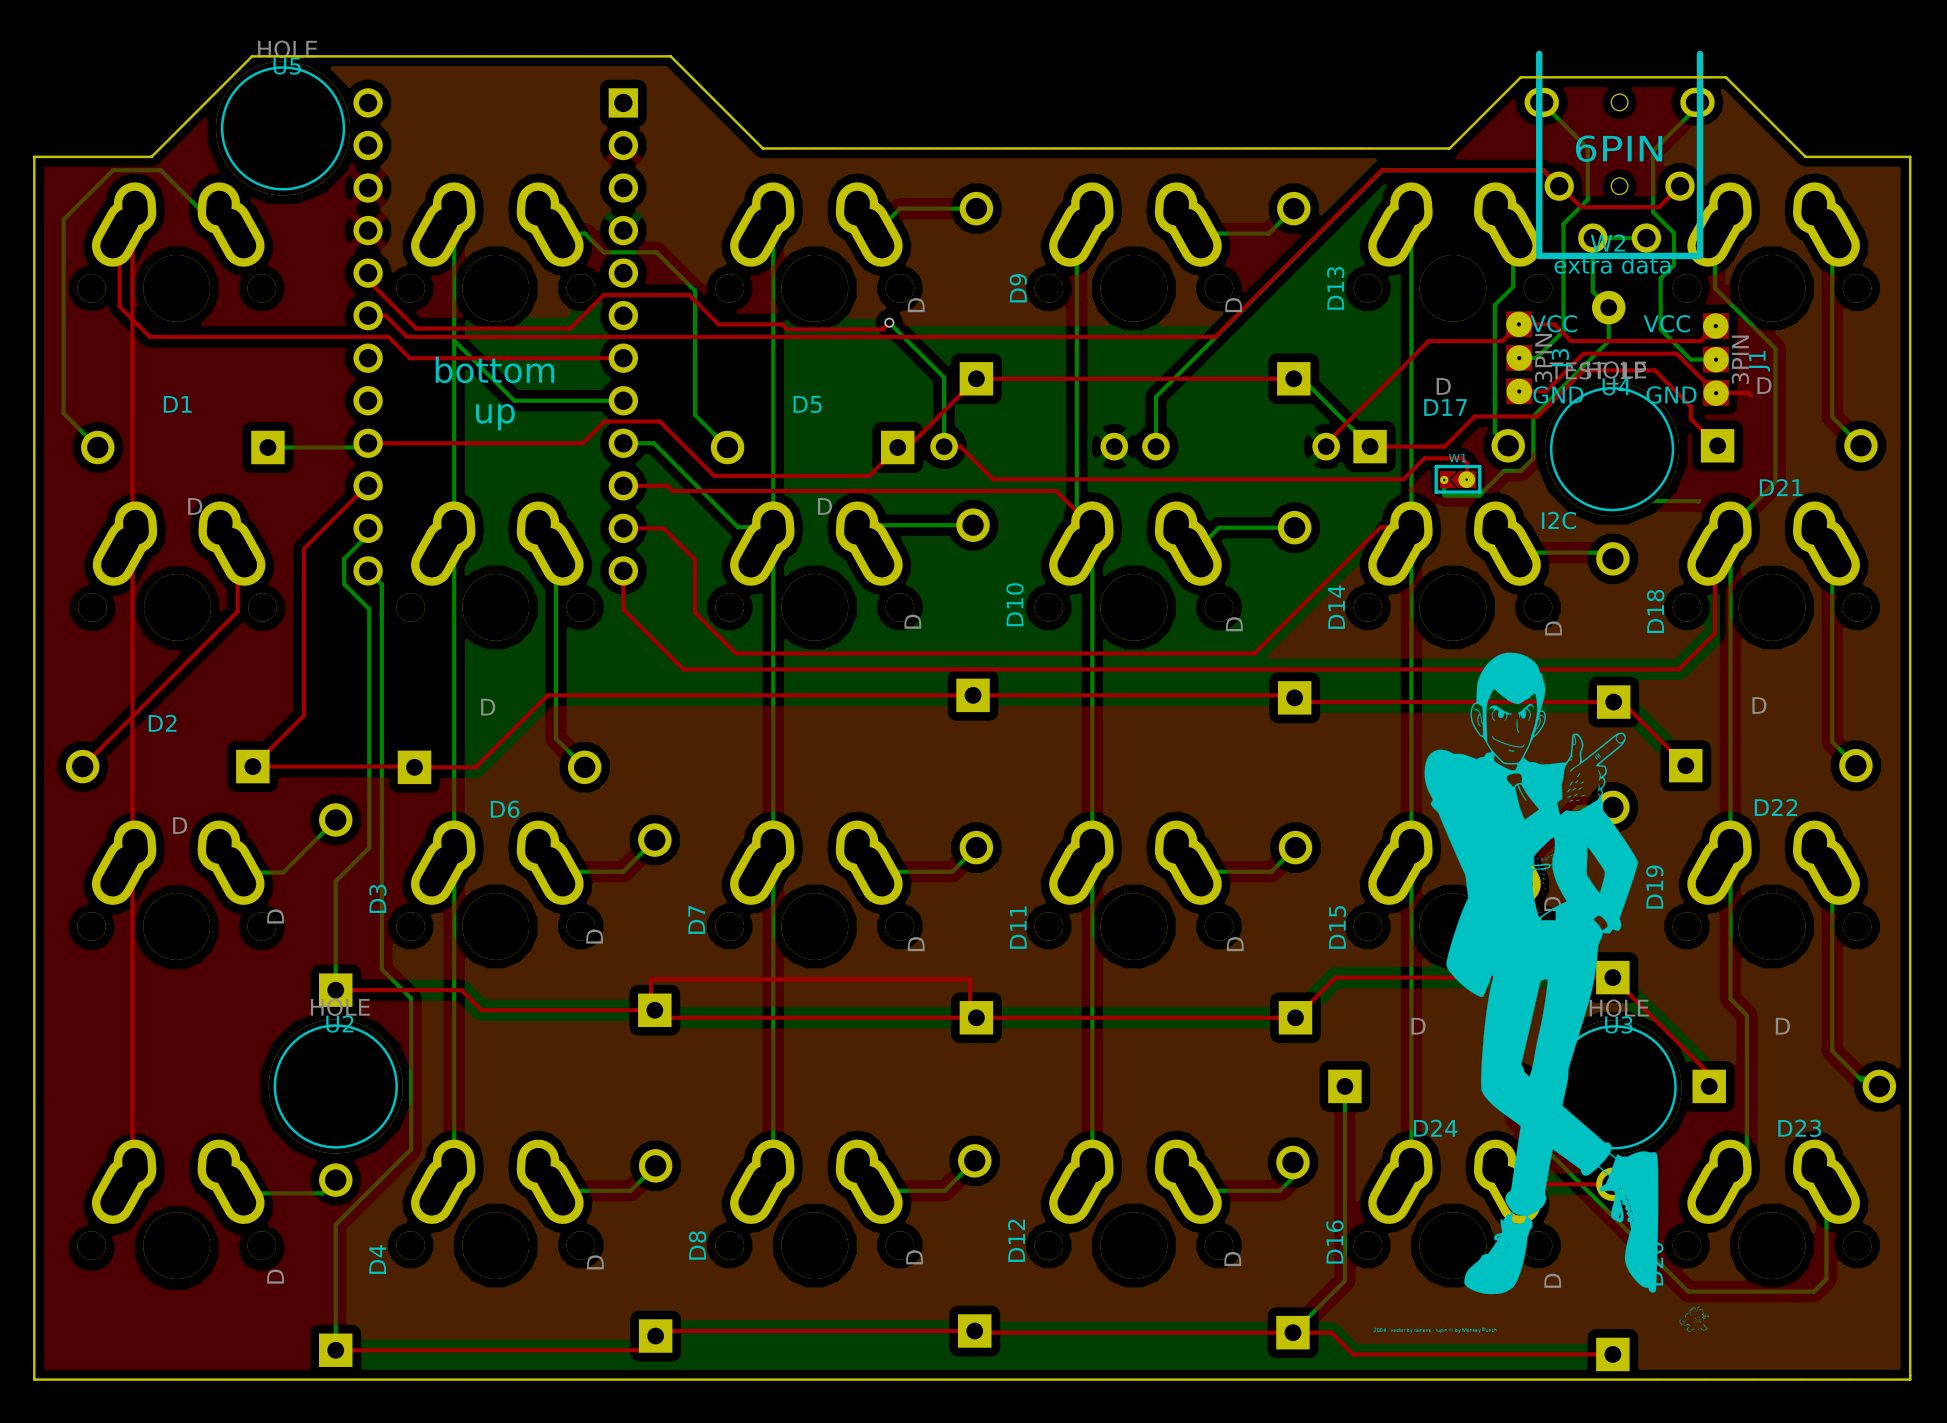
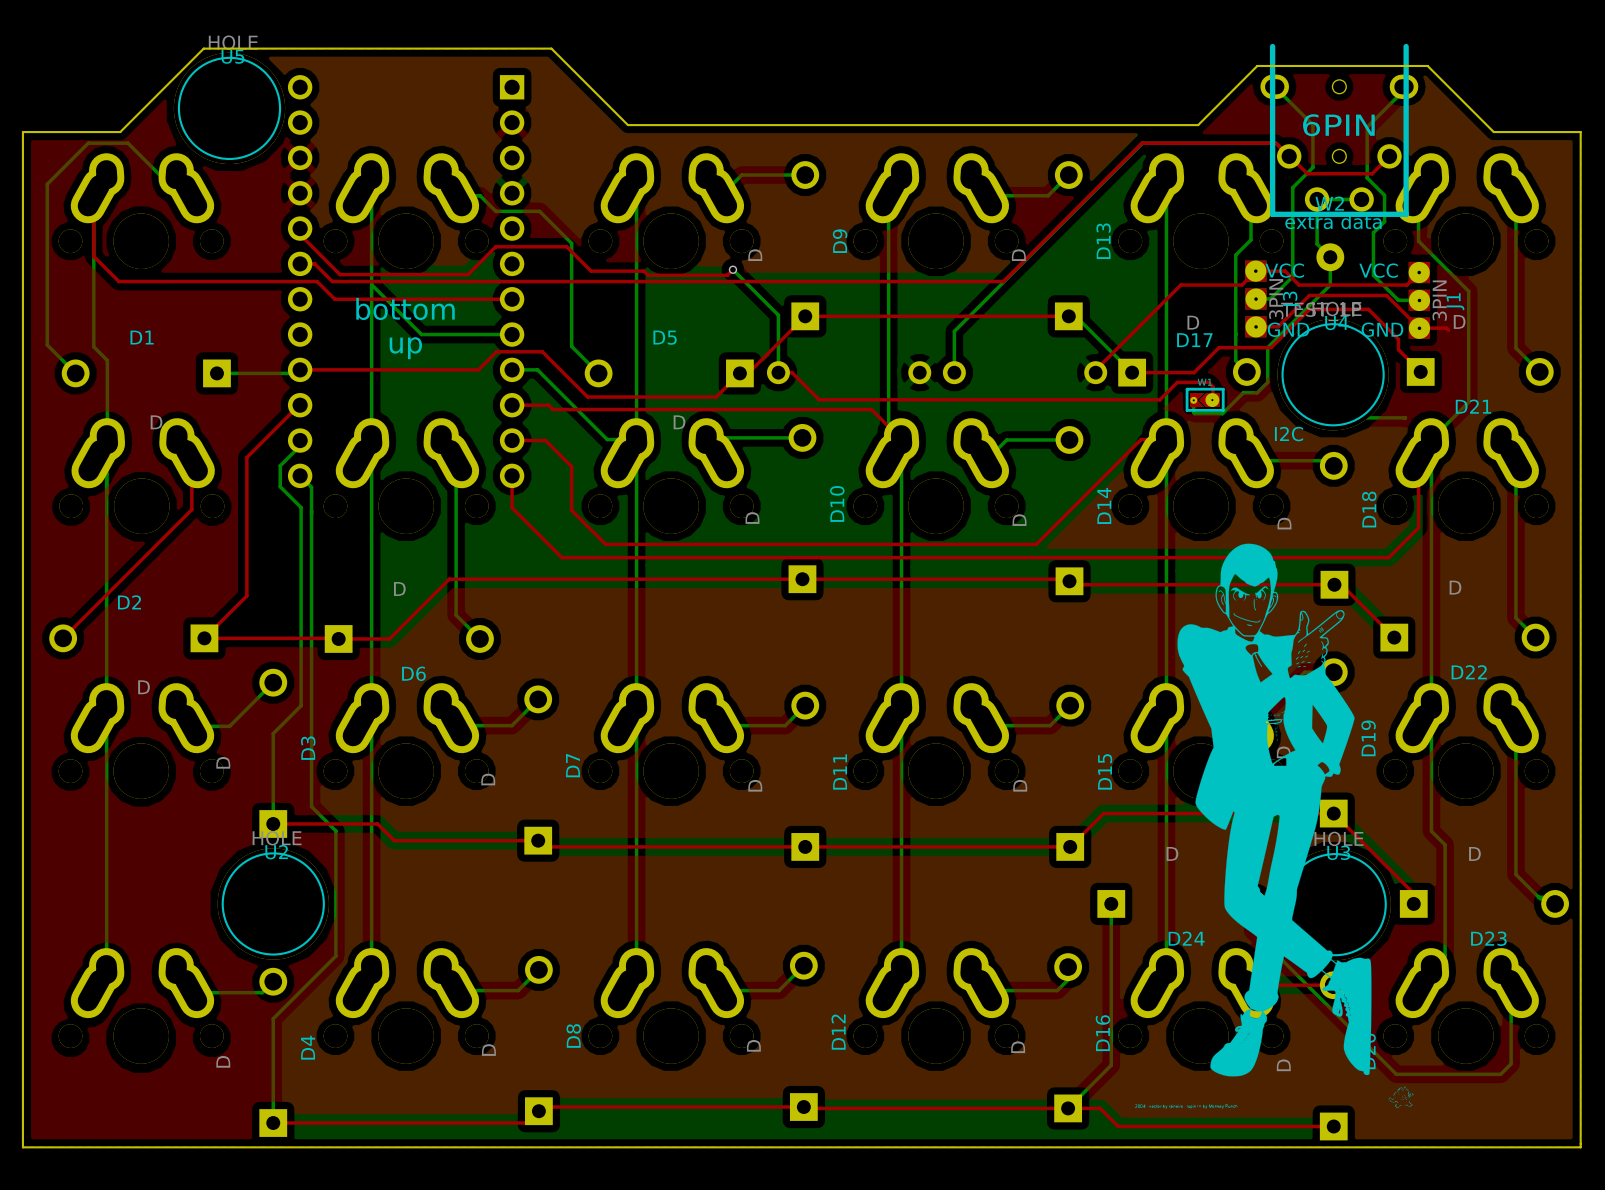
top track: (119, 233) (132, 221) (132, 1178) (135, 1165) -> none
bottom track: none -> (93, 195) (93, 346) (107, 360) (106, 971)
top track: (654, 1010) (650, 1019) (650, 979) (970, 979) (970, 1019) (976, 1017) -> none

